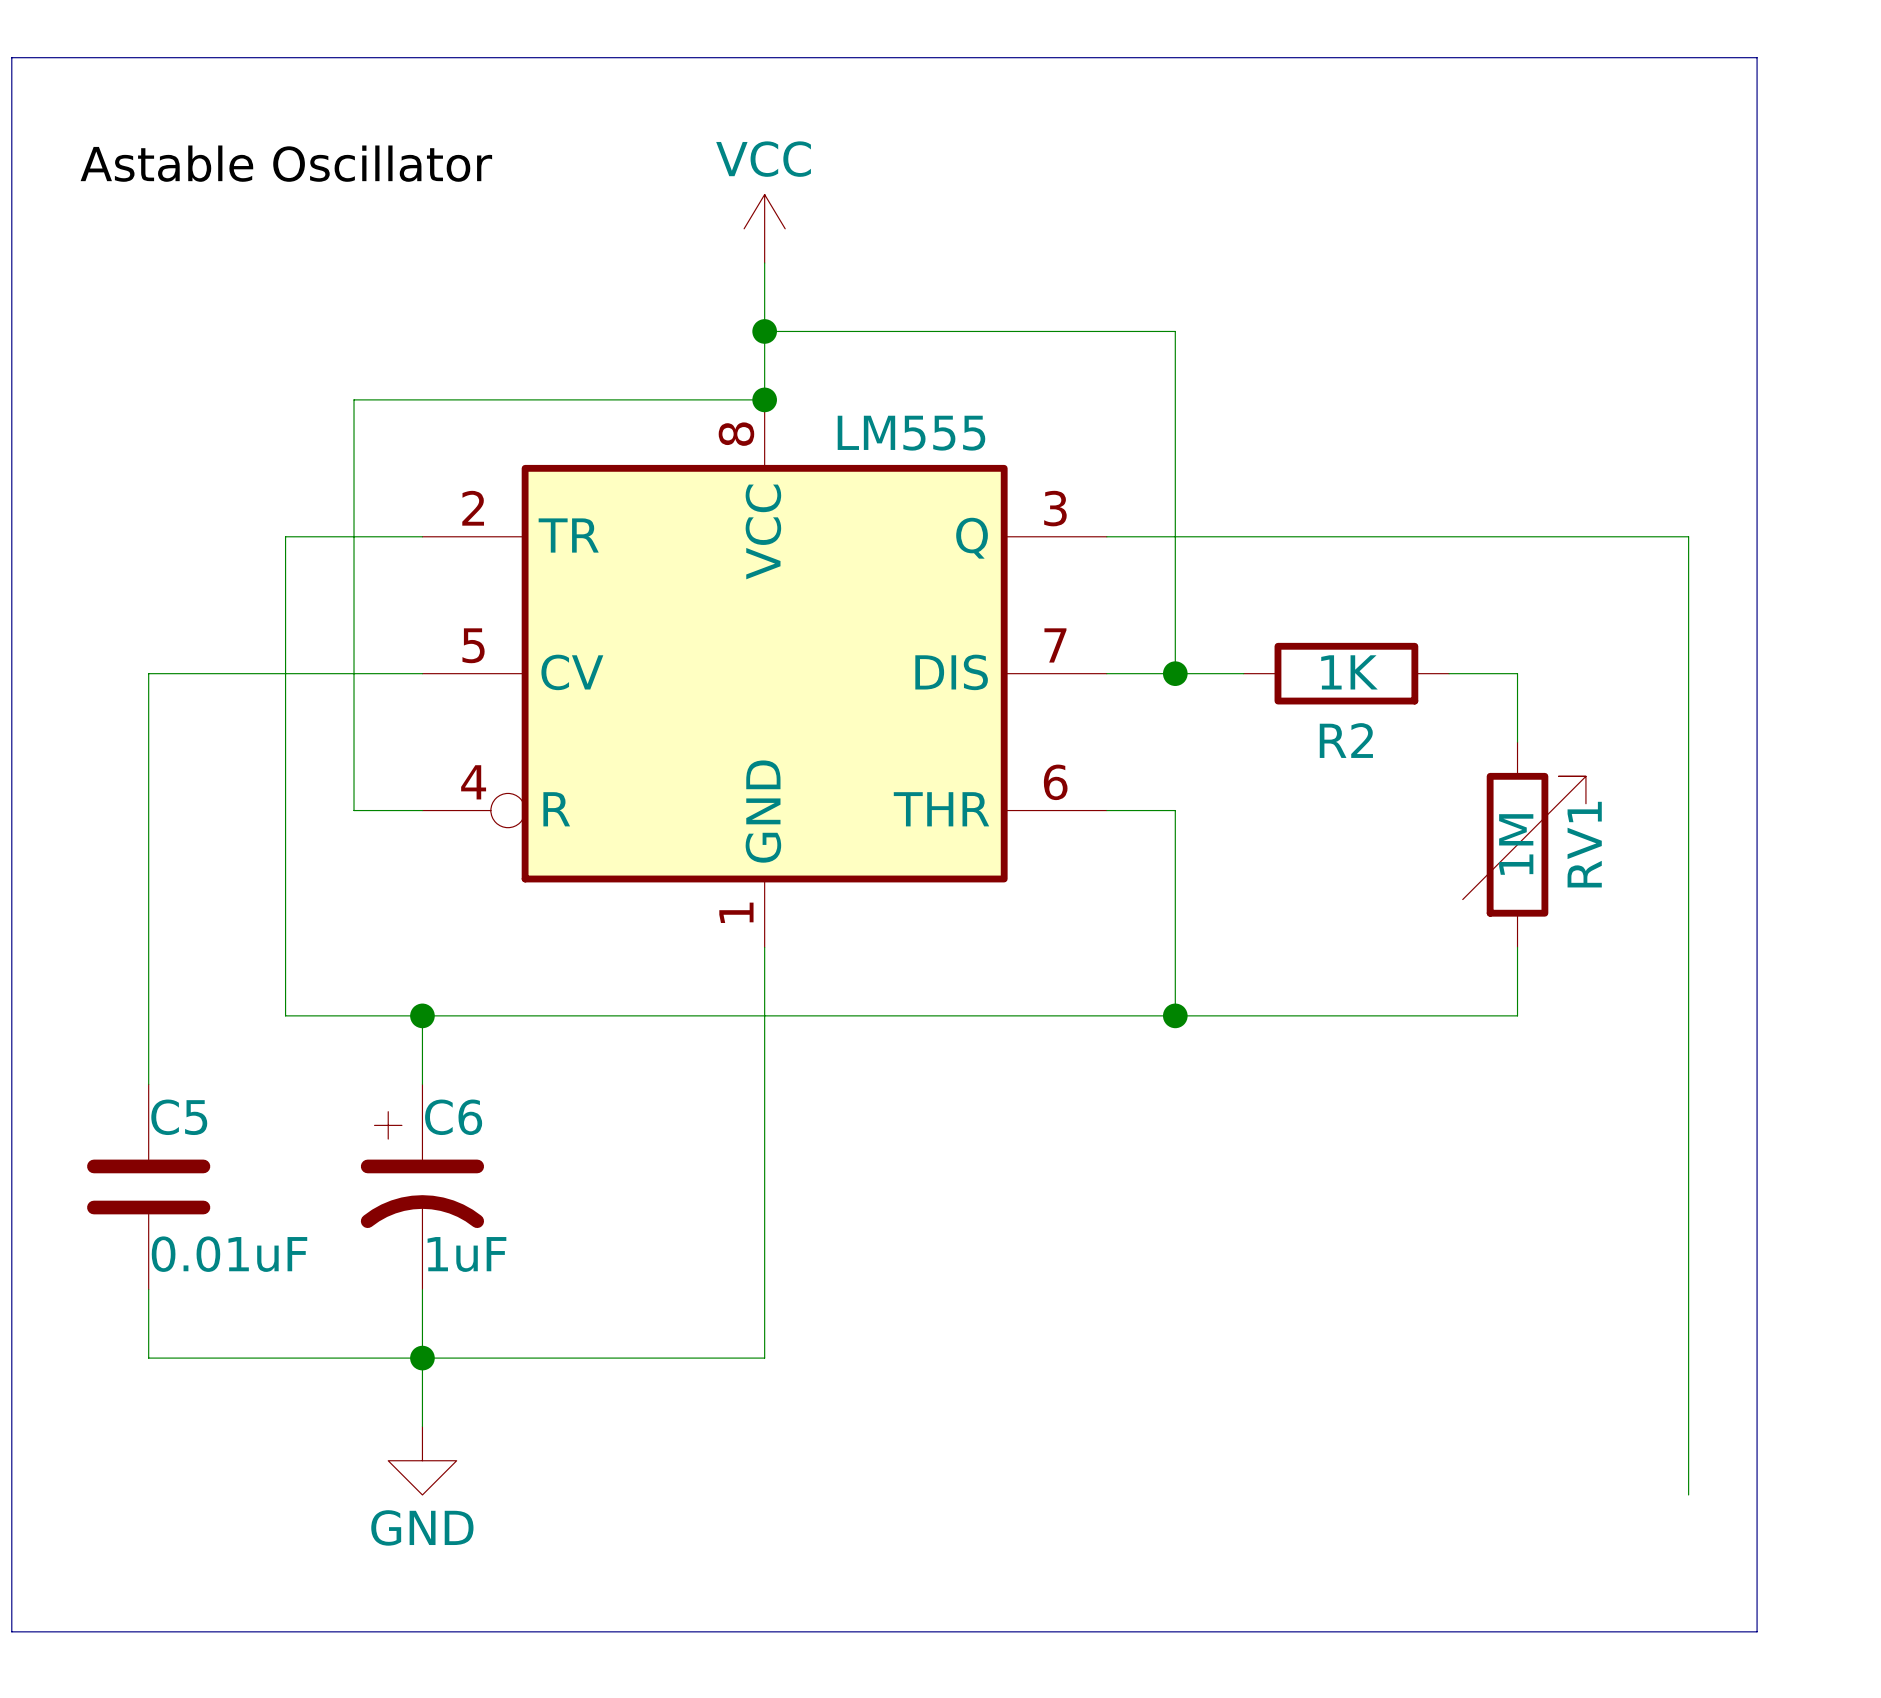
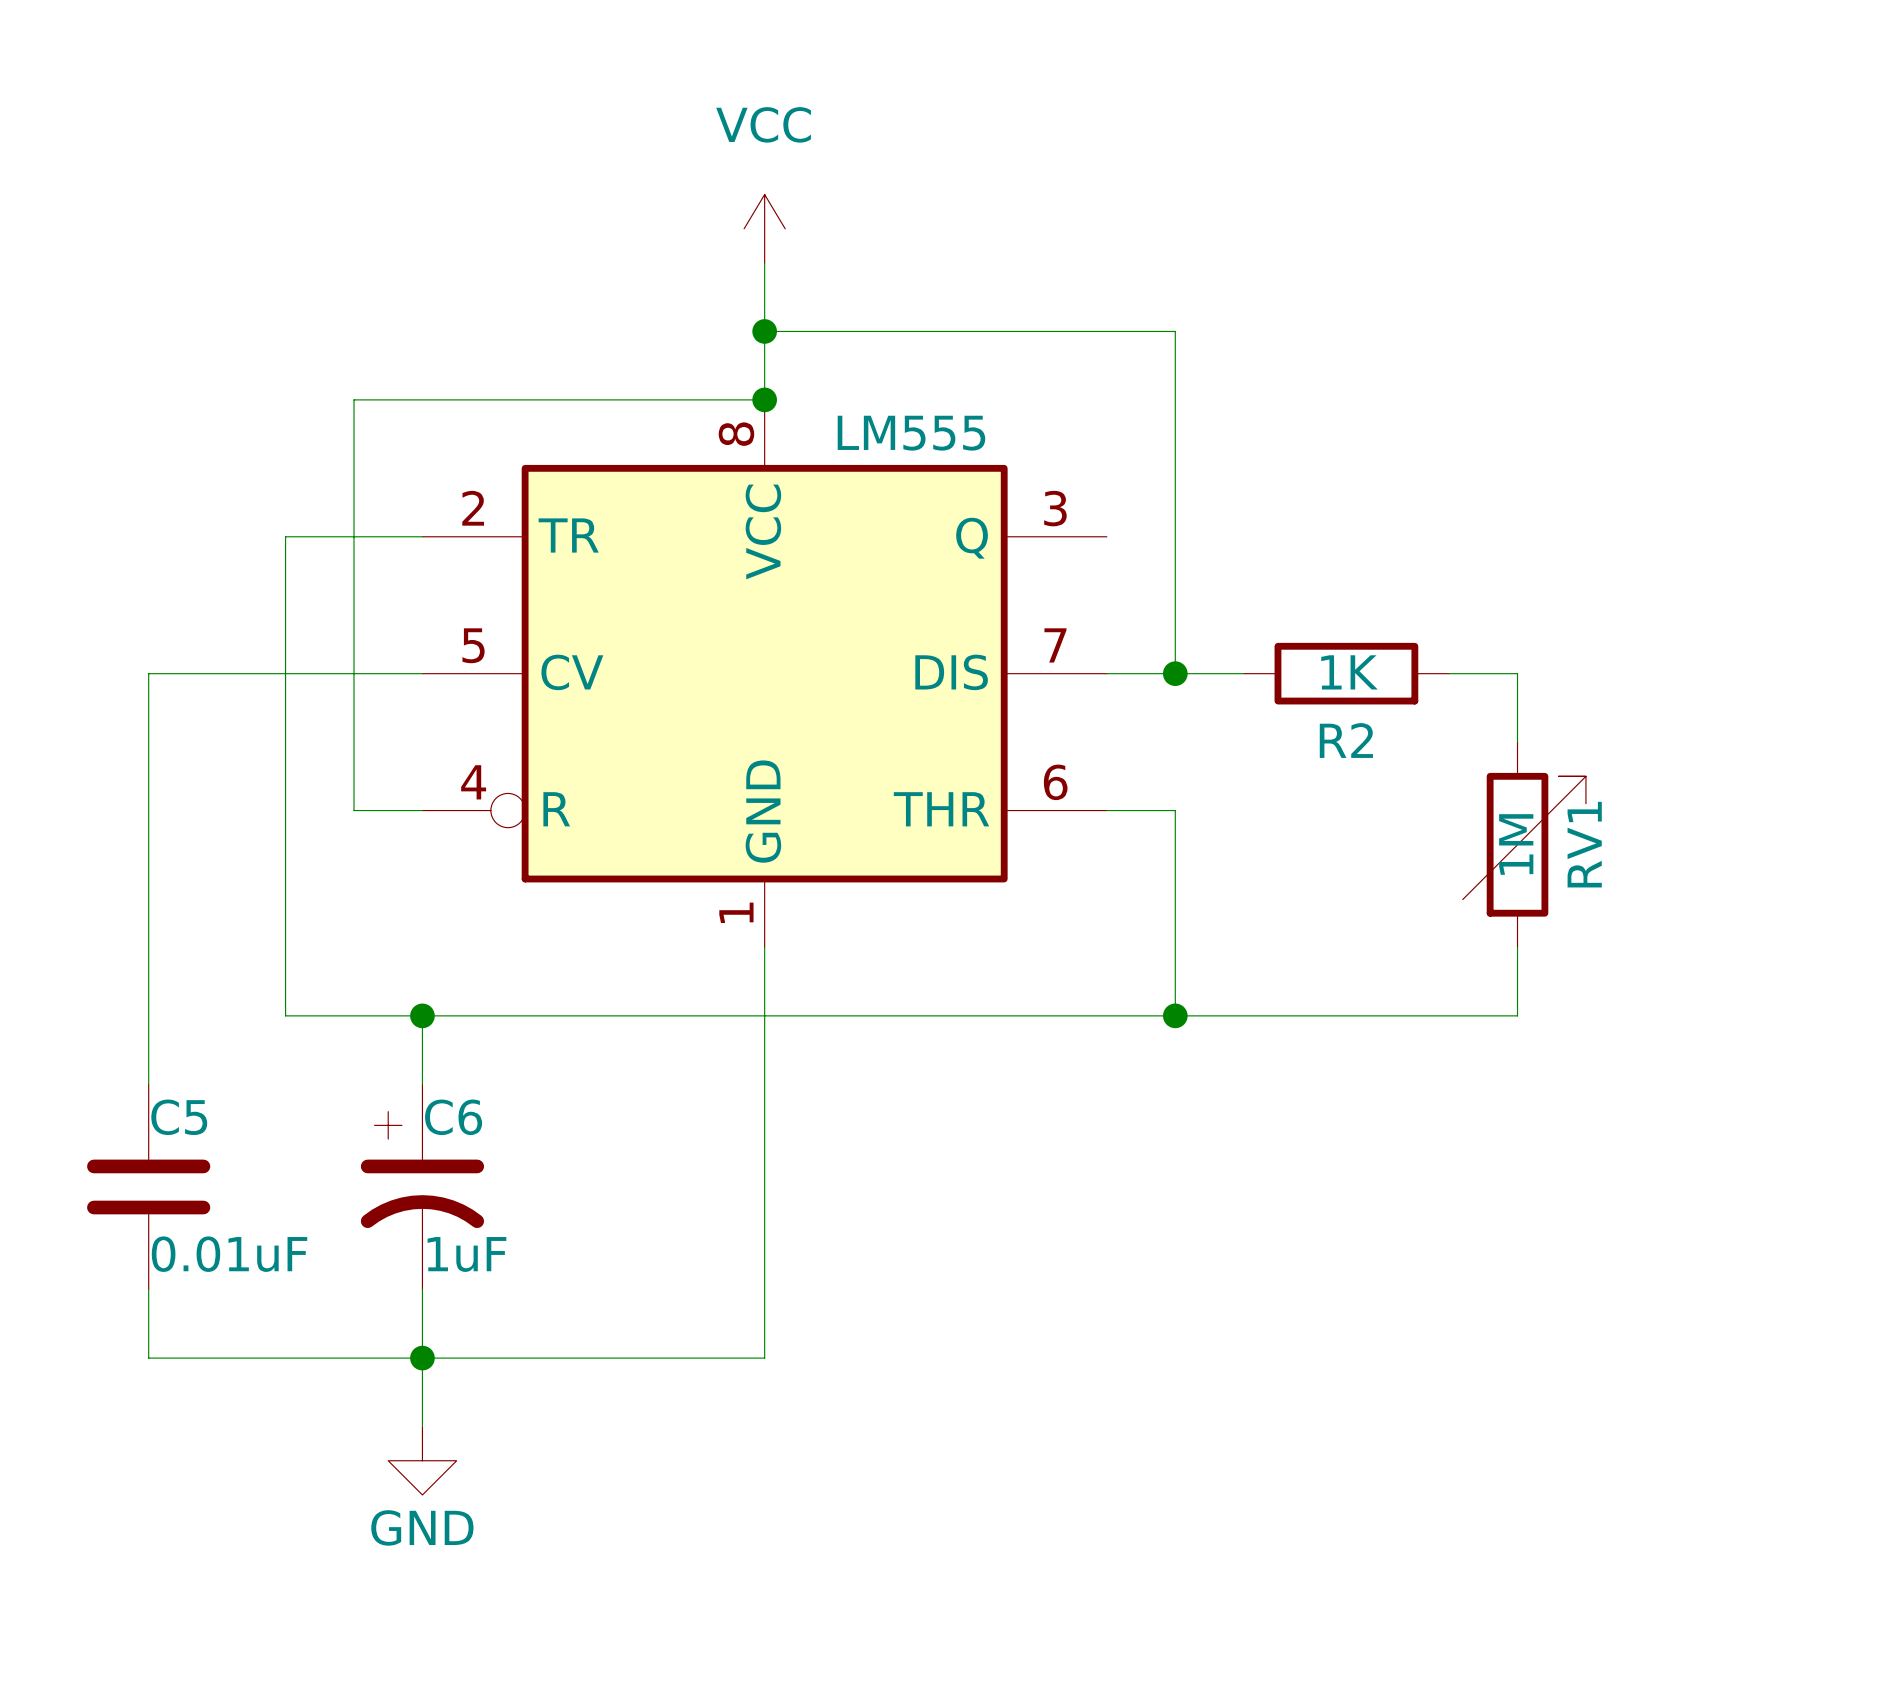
line: (11, 57) (1757, 57) (1757, 1631) (11, 1631) (11, 57) -> none
power symbol text position: VCC (763, 159) -> VCC (763, 124)
label: Astable Oscillator (286, 163) -> none
wire: (1106, 536) (1688, 536) (1688, 1494) -> none

